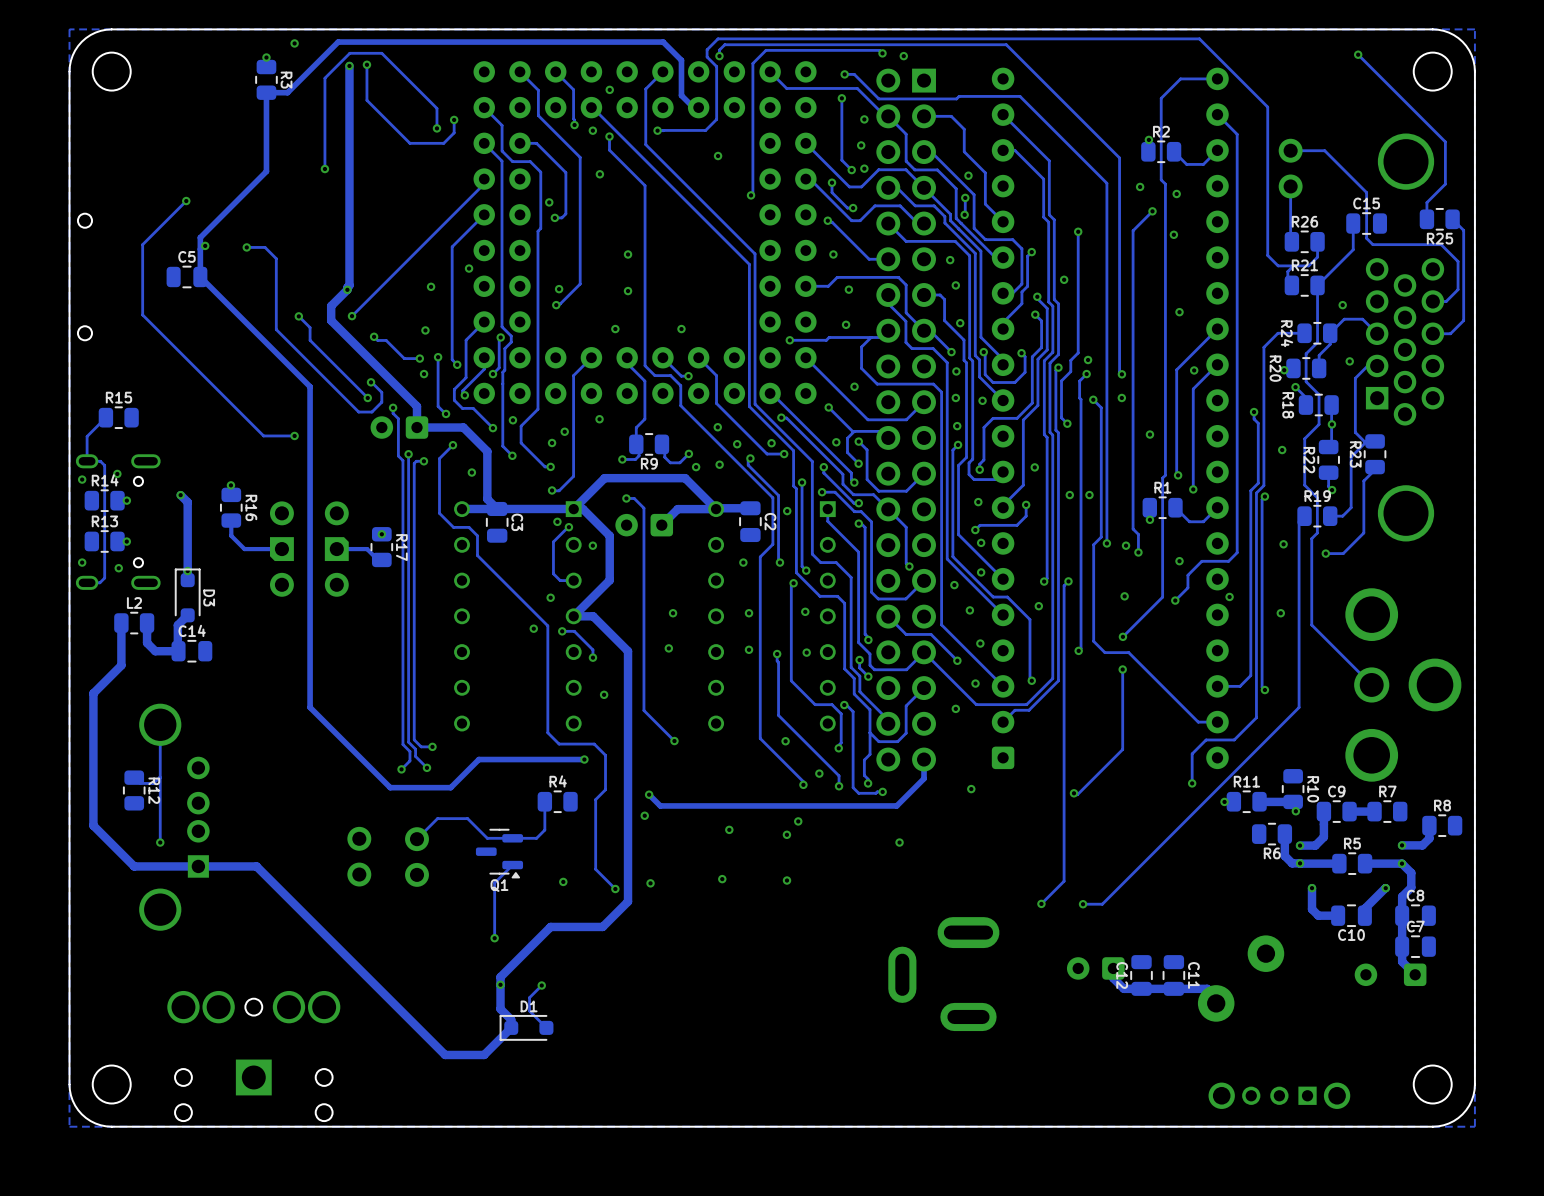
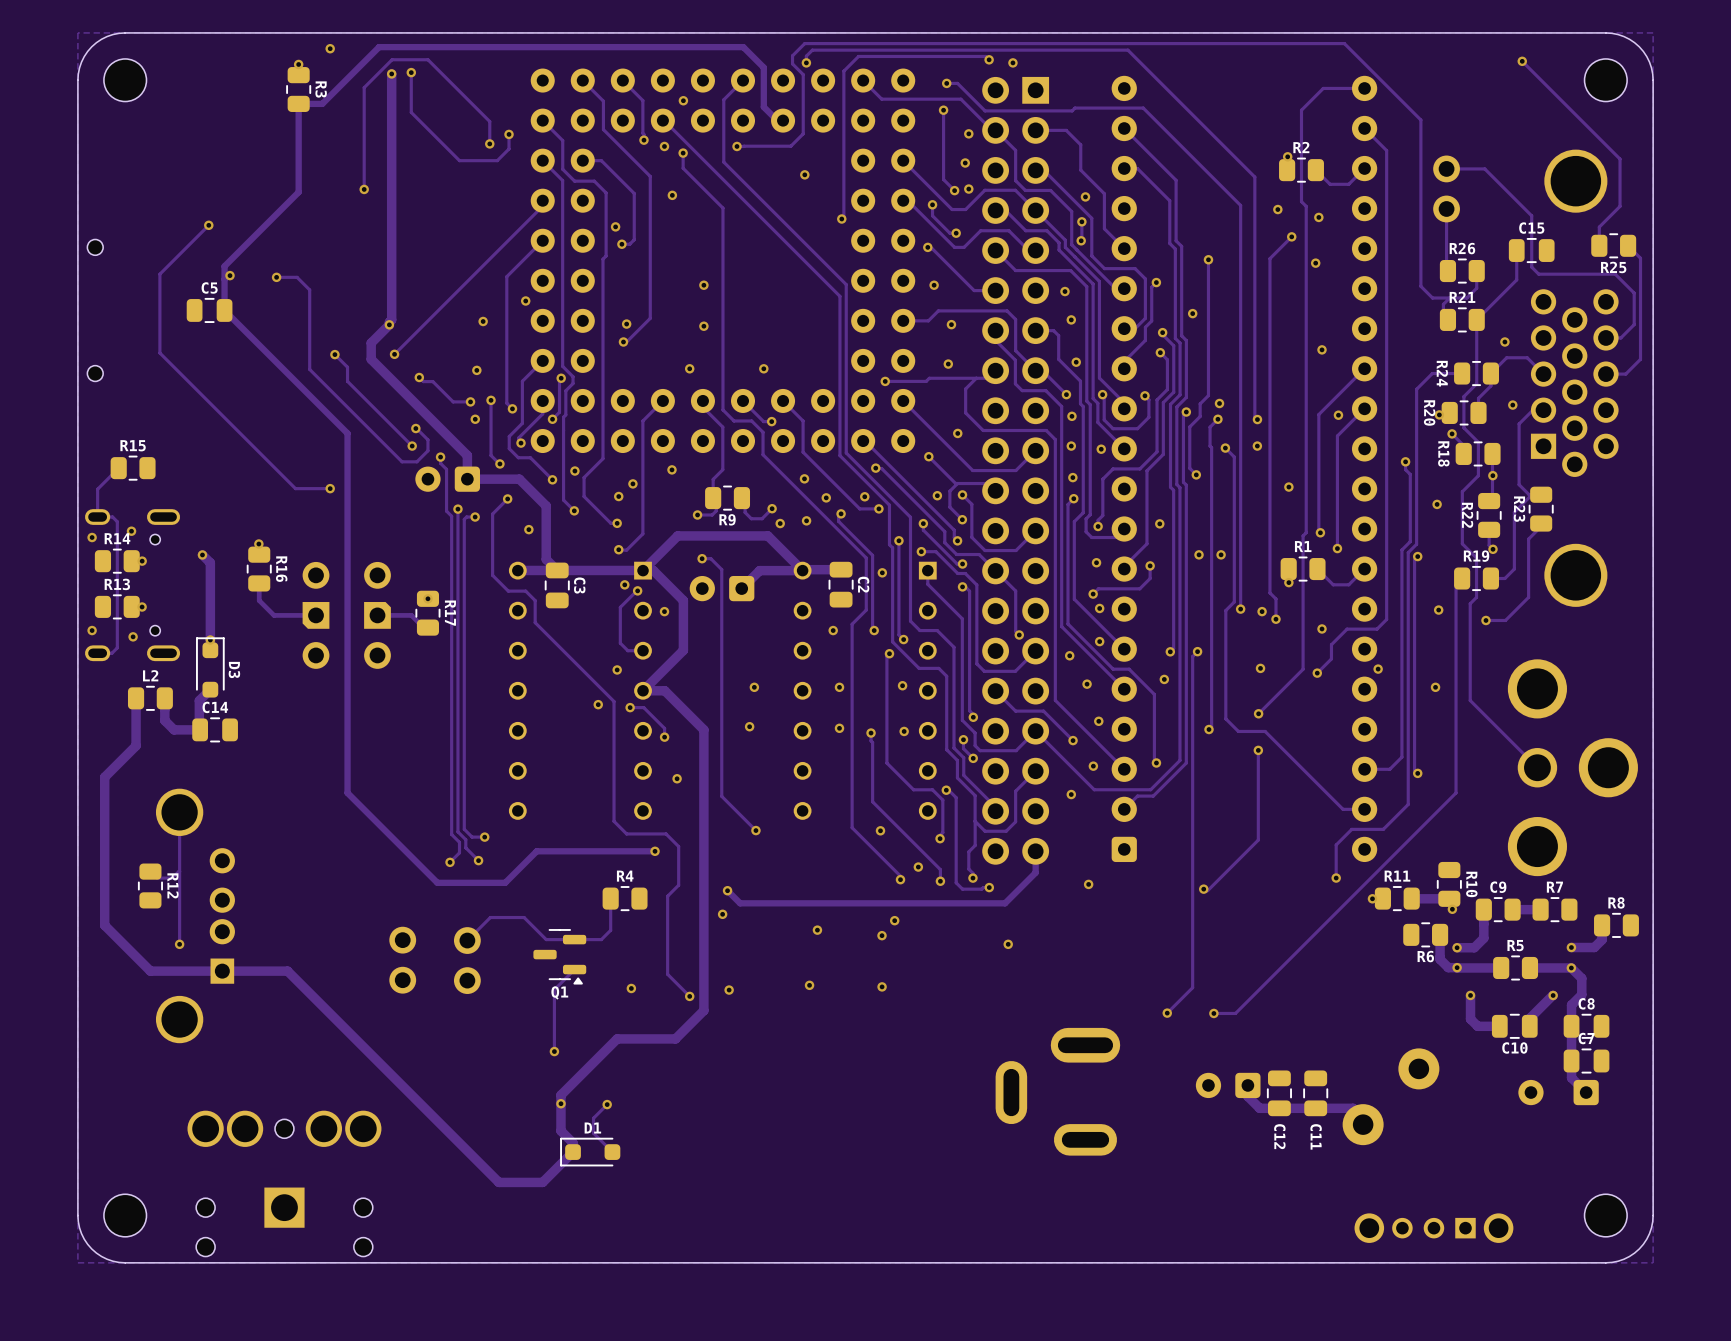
C12 name position: C12 (1122, 975) -> C12 (1279, 1136)
C11 name position: C11 (1193, 975) -> C11 (1316, 1136)

